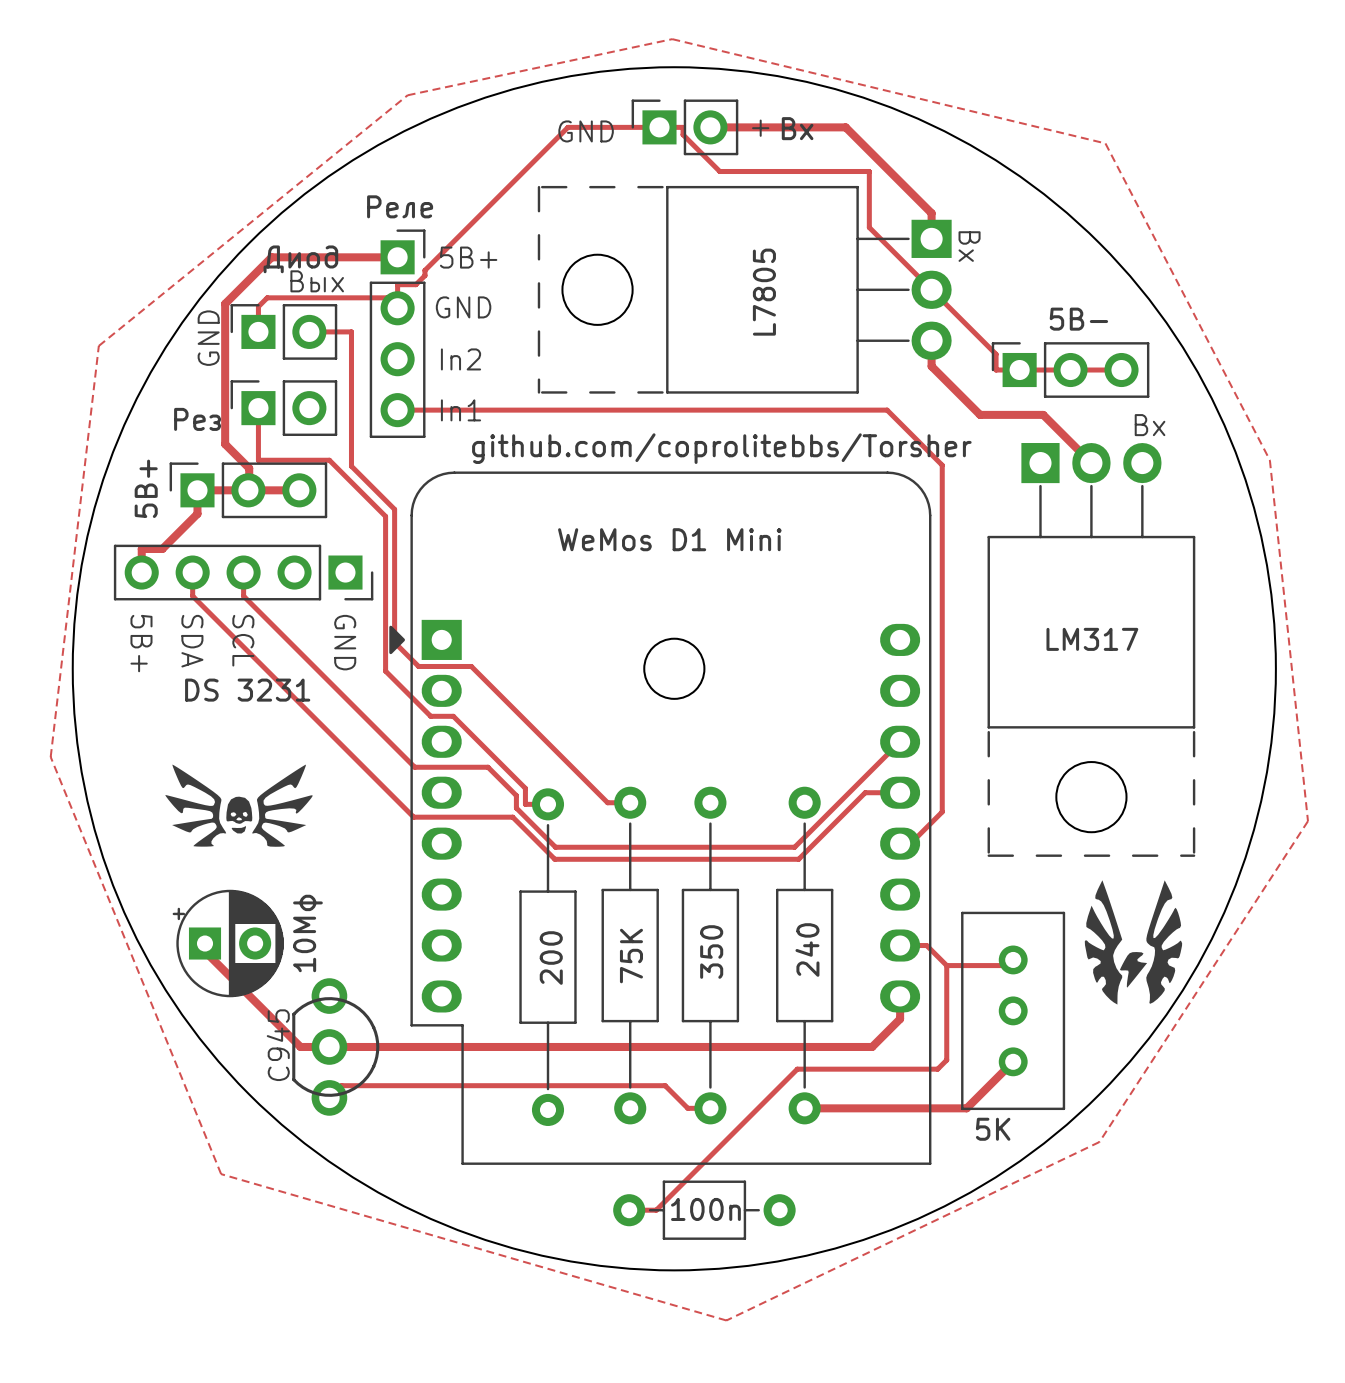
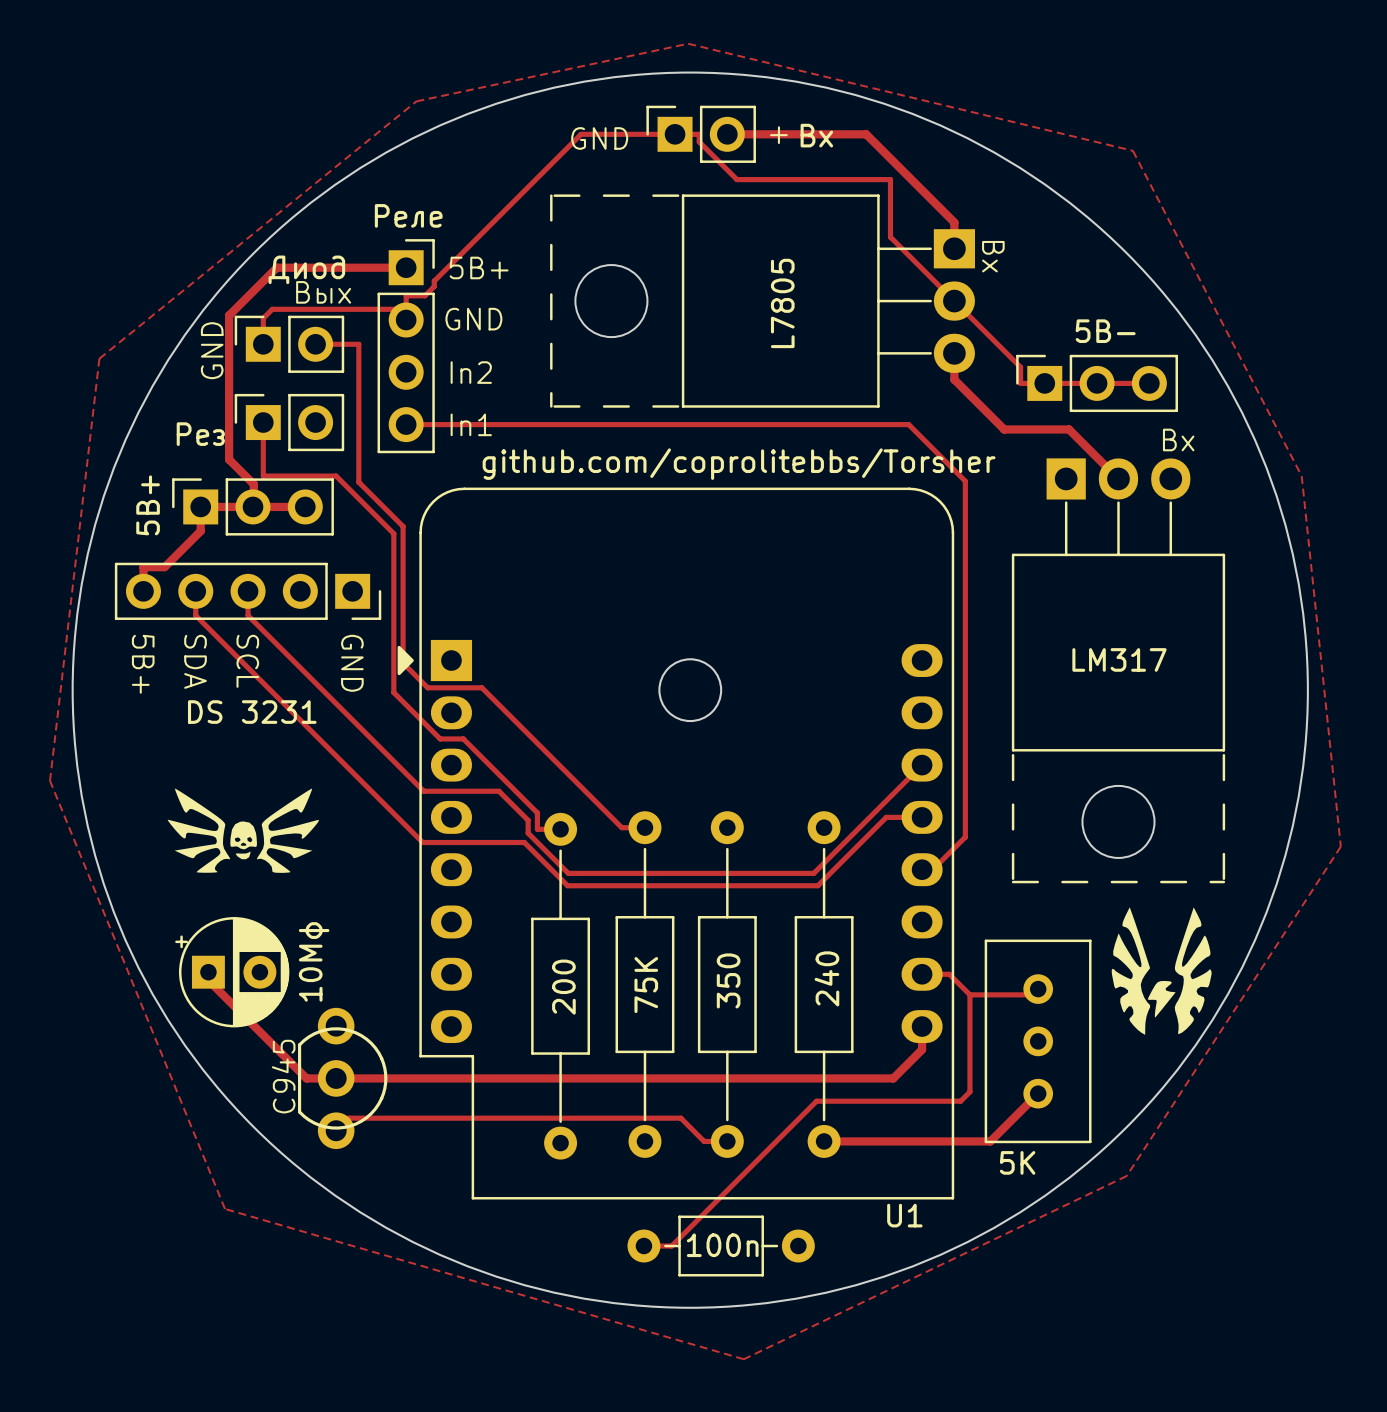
U1 value: WeMos D1 Mini (669, 539) -> none
U1 name: none -> U1 (904, 1215)

